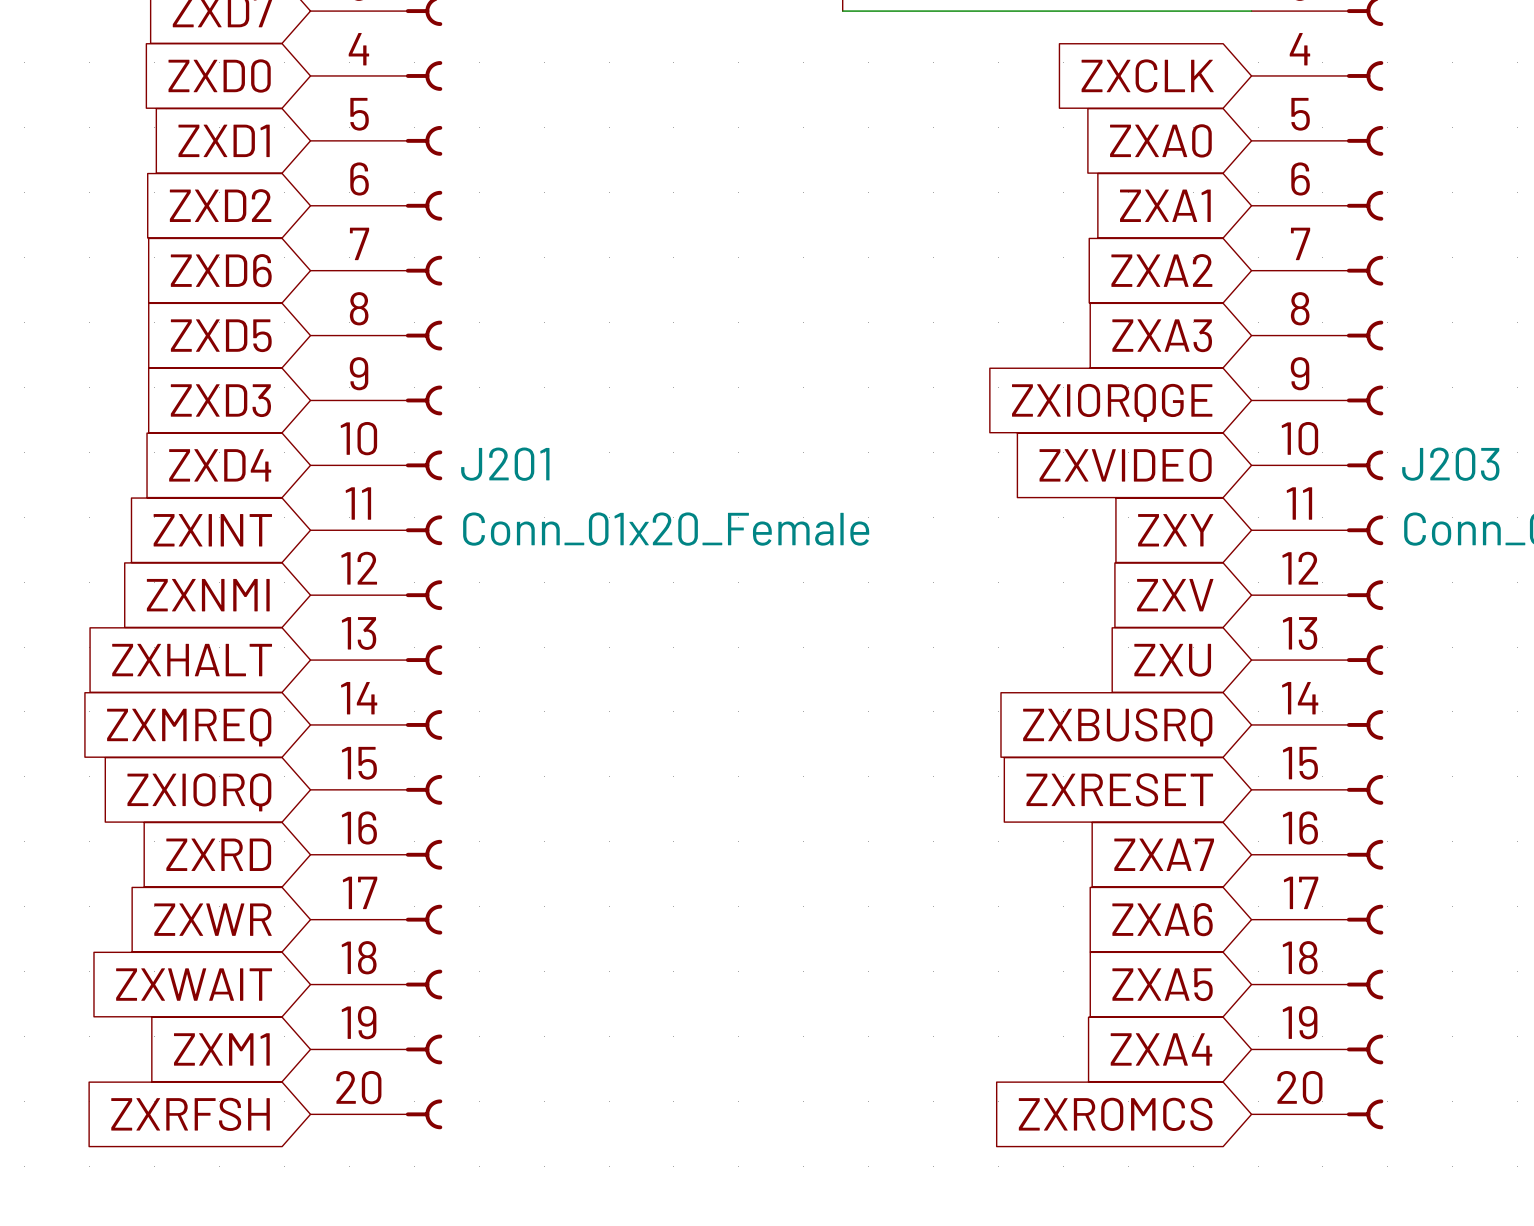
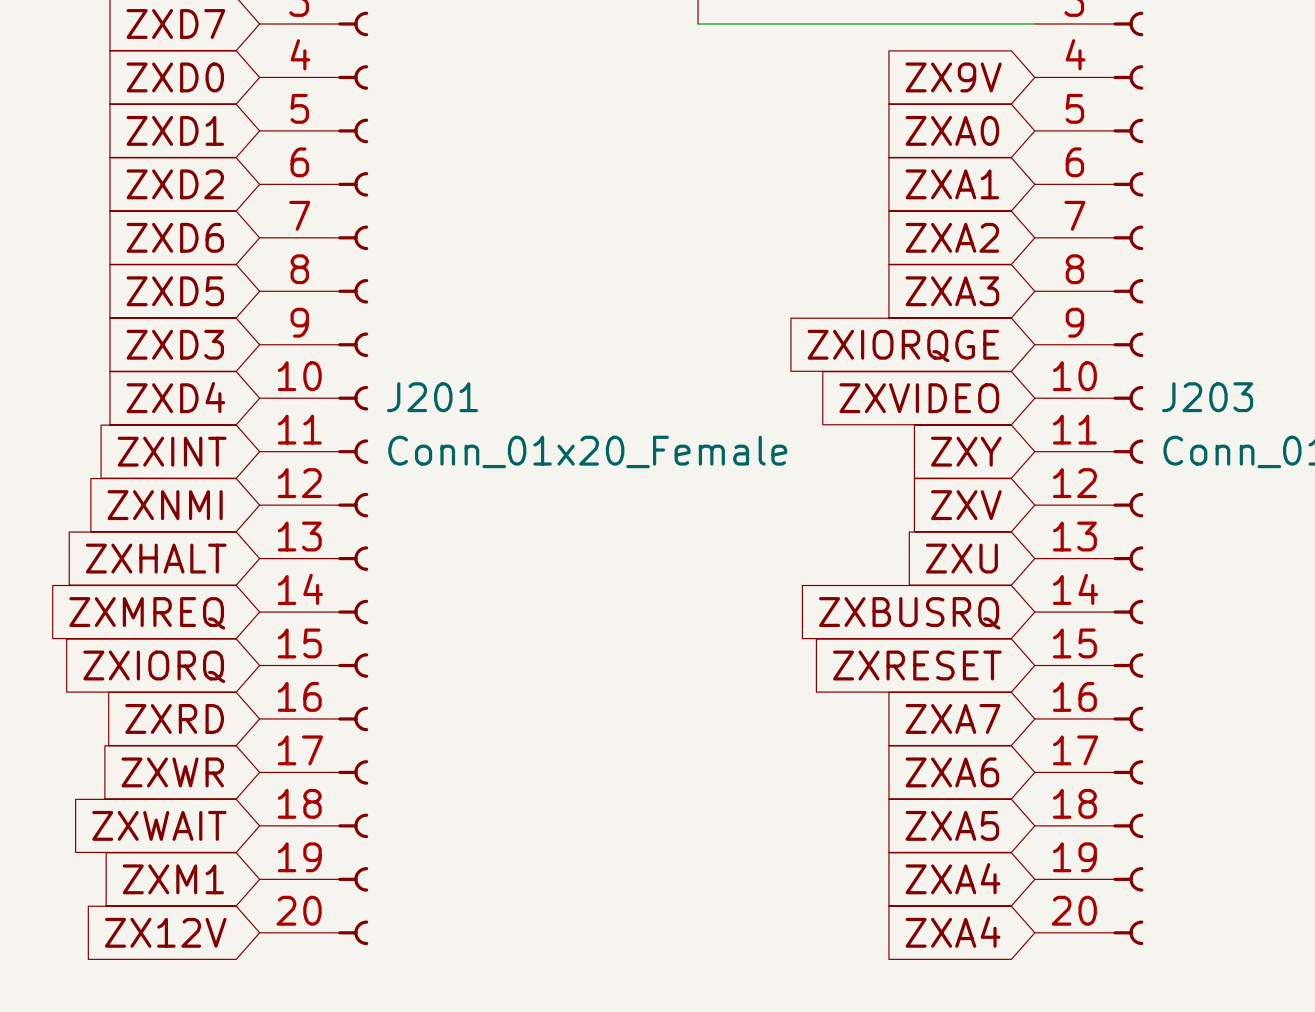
global label: ZXCLK (1147, 76) -> ZX9V (953, 77)
global label: ZXRFSH (190, 1114) -> ZX12V (165, 932)
global label: ZXROMCS (1115, 1114) -> ZXA4 (953, 932)

